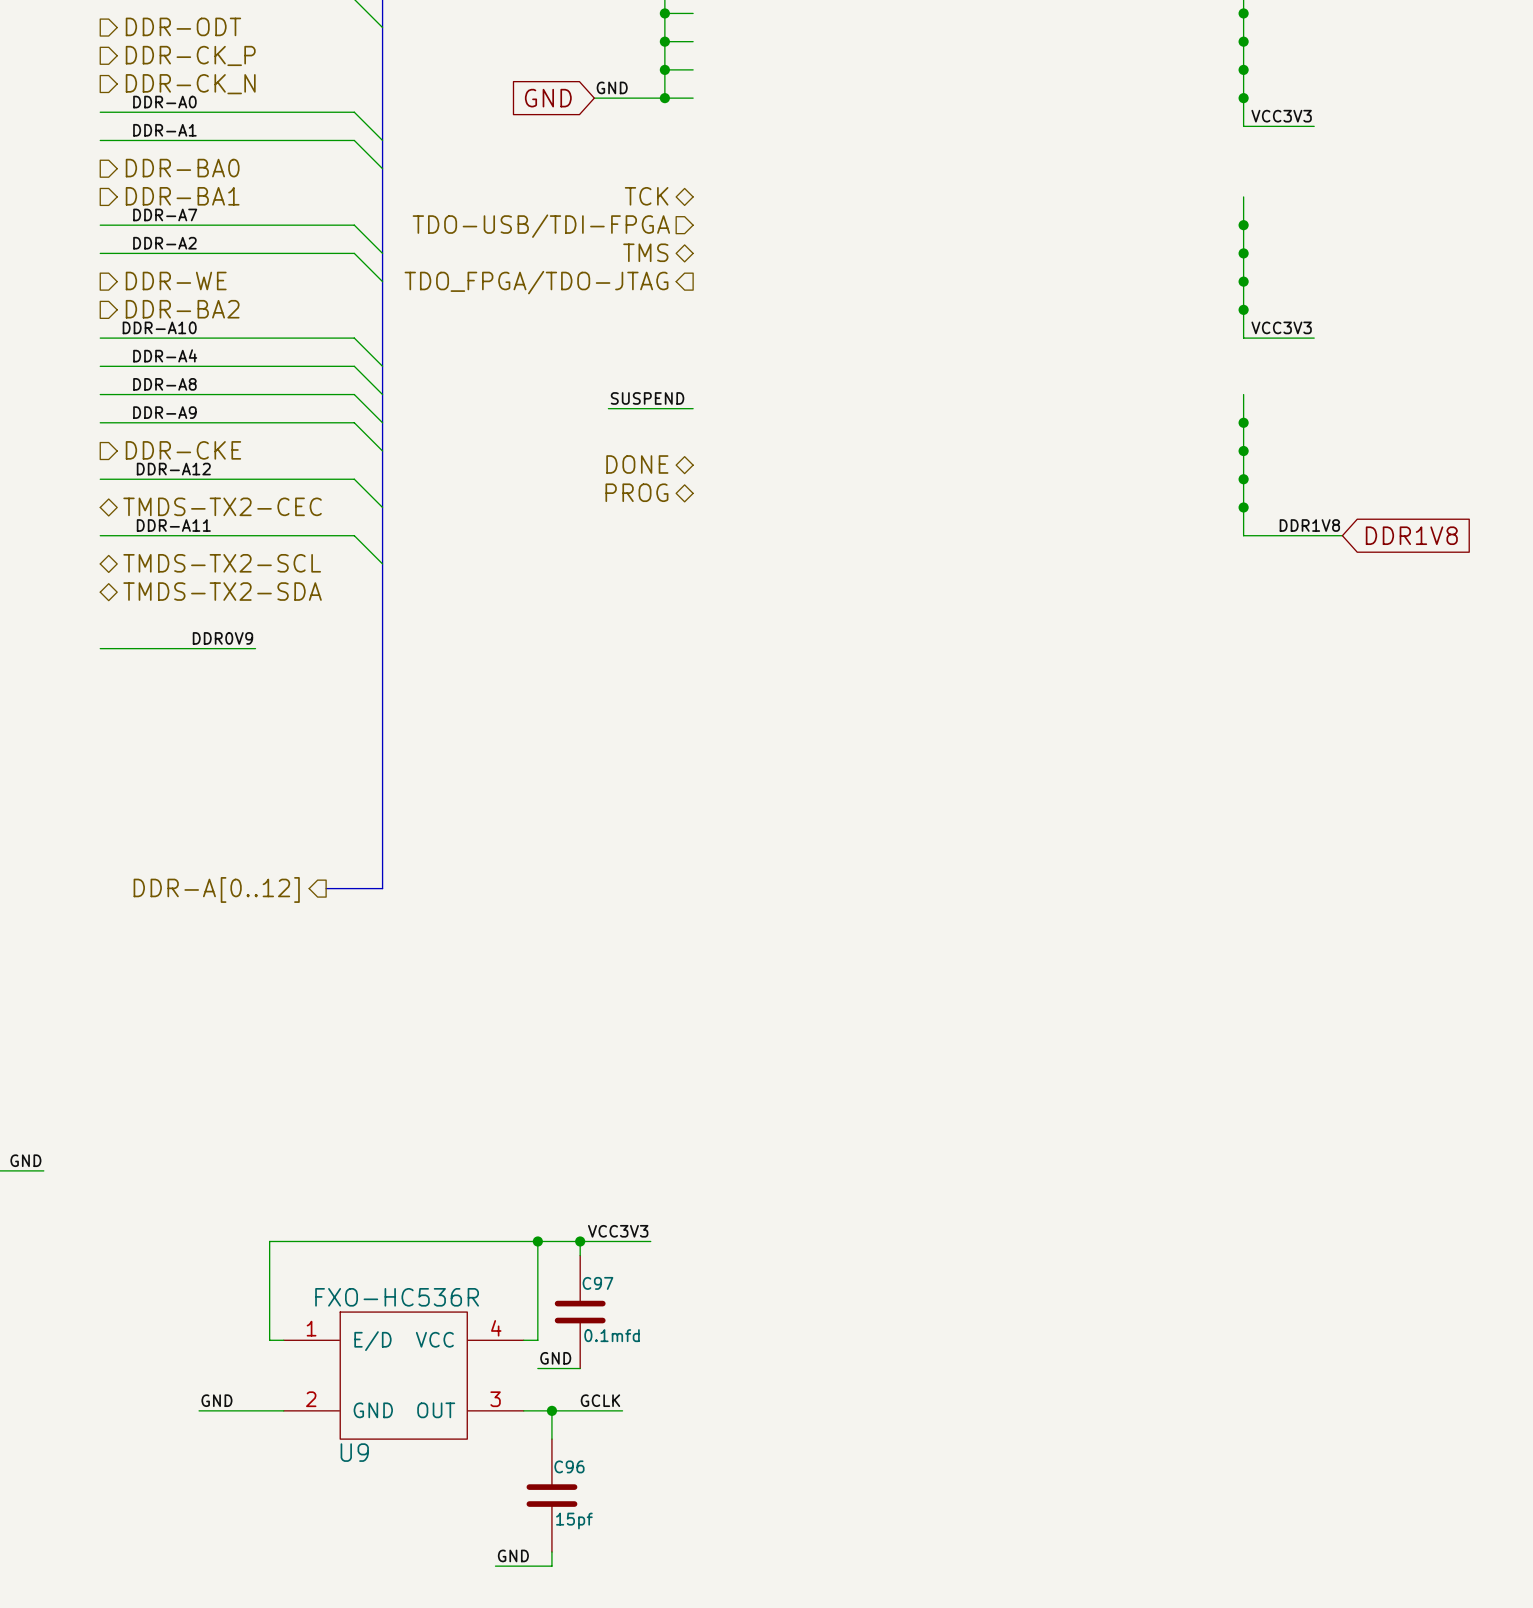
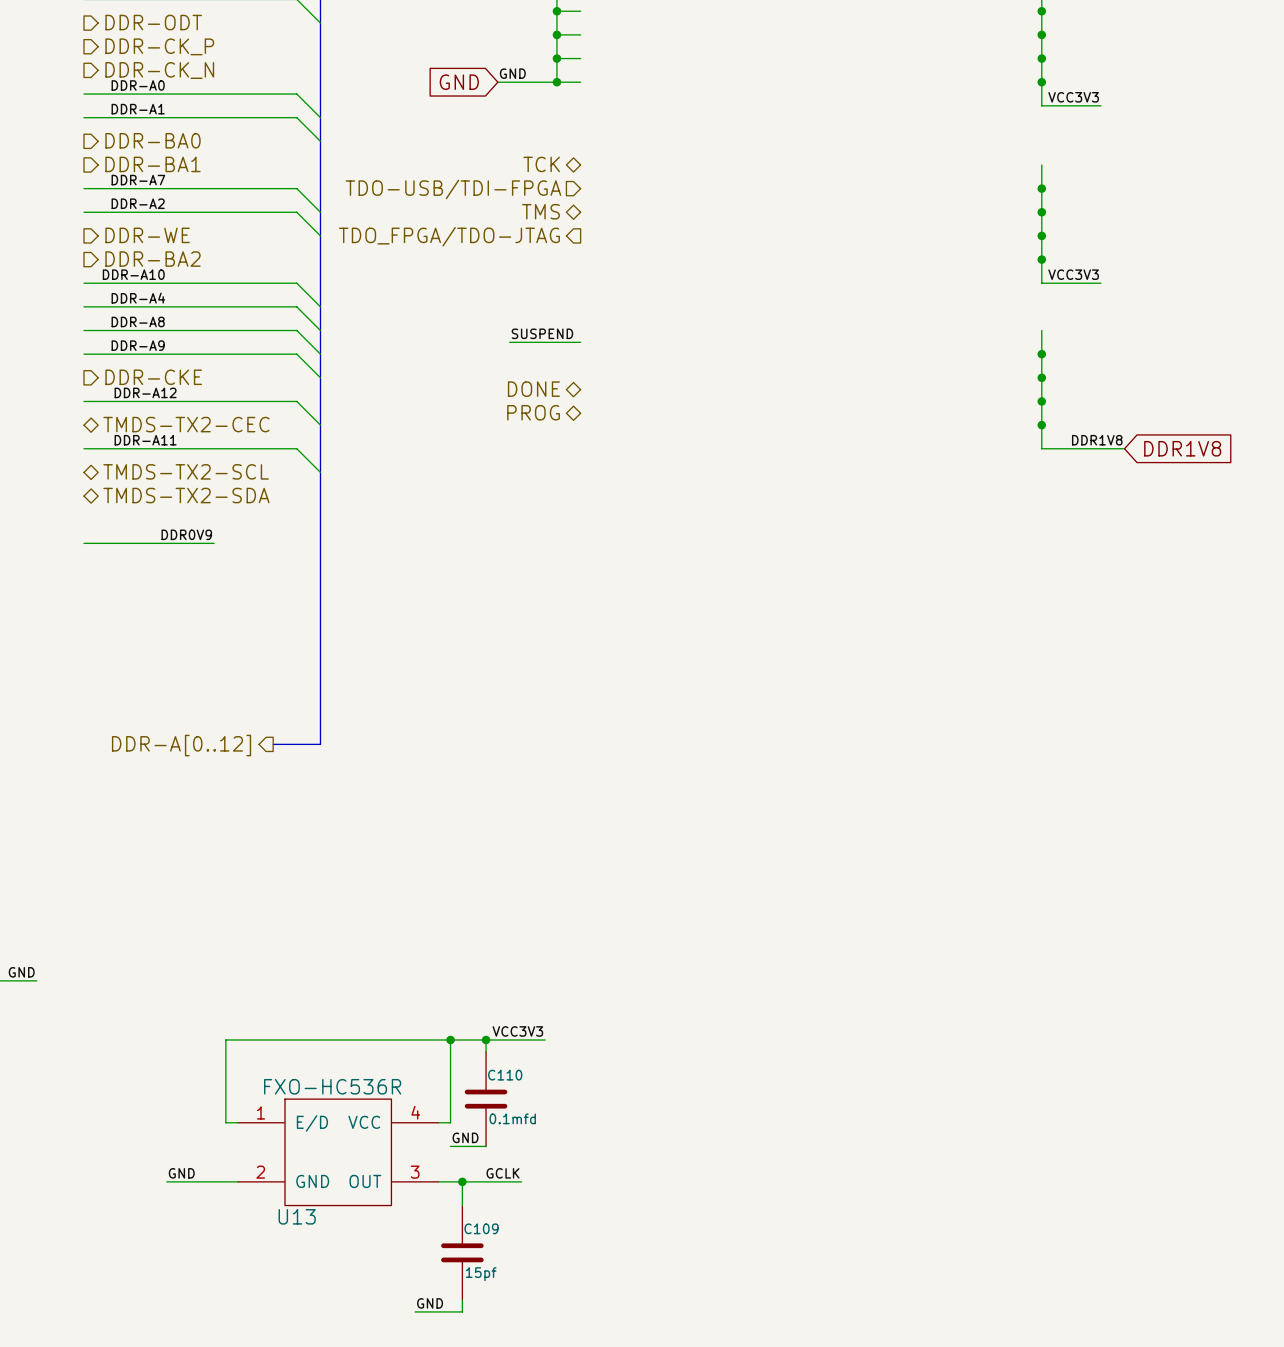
C97 name: C97 (597, 1283) -> C110 (505, 1075)
U9 name: U9 (354, 1452) -> U13 (297, 1216)
C96 name: C96 (569, 1466) -> C109 (481, 1228)

